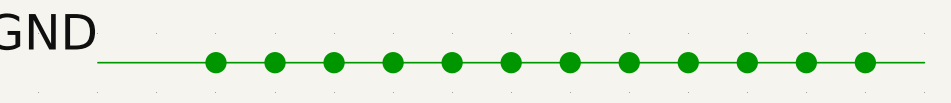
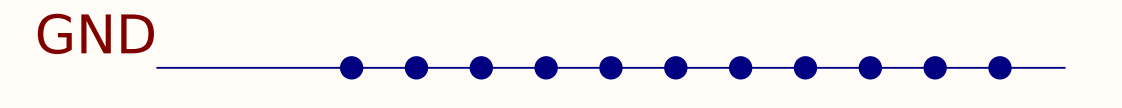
junction: (215, 62) -> none

